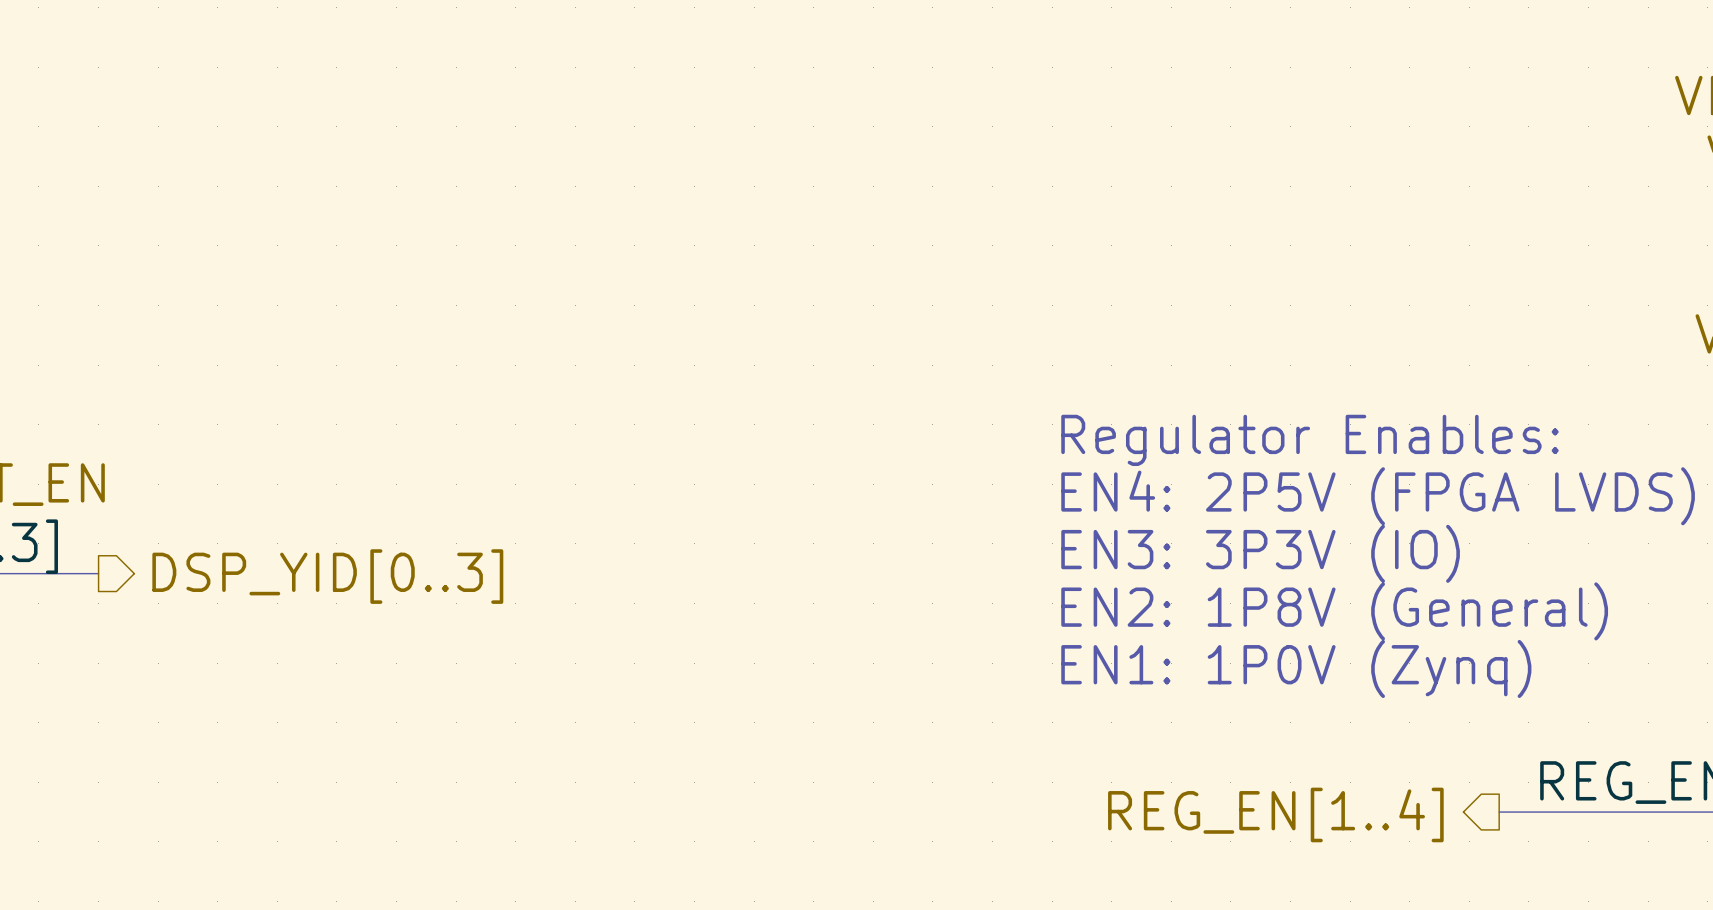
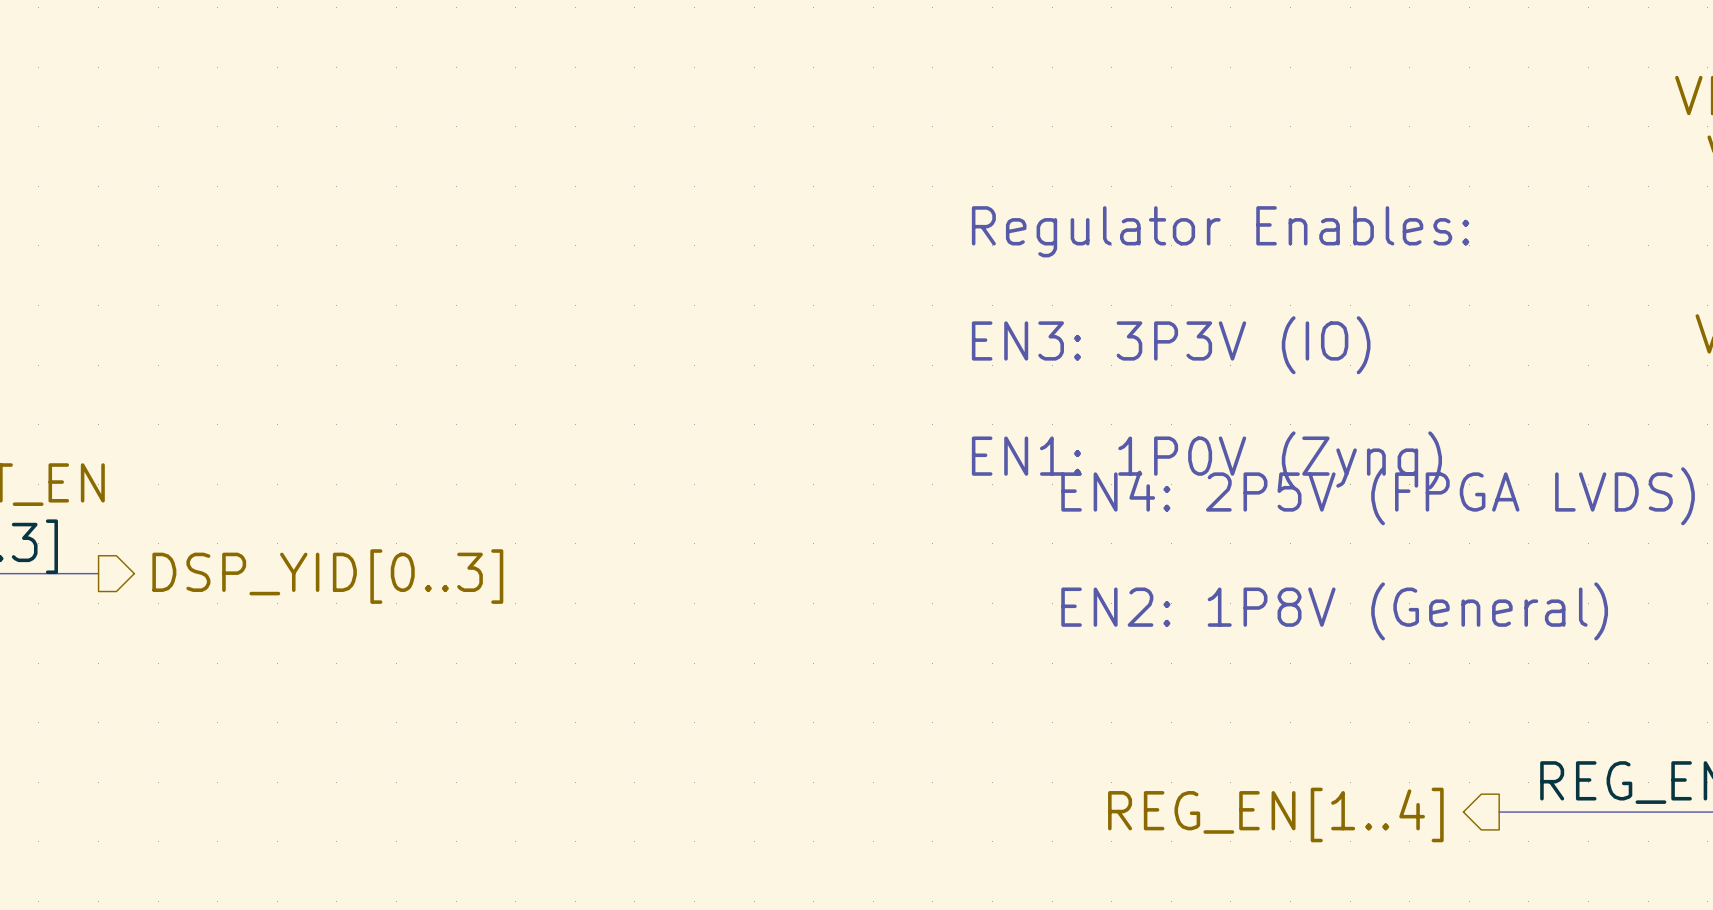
text position: Regulator Enables: (1309, 440) -> Regulator Enables: (1220, 231)
text position: EN3: 3P3V (IO) (1260, 553) -> EN3: 3P3V (IO) (1171, 345)
text position: EN1: 1P0V (Zynq) (1296, 668) -> EN1: 1P0V (Zynq) (1206, 460)

